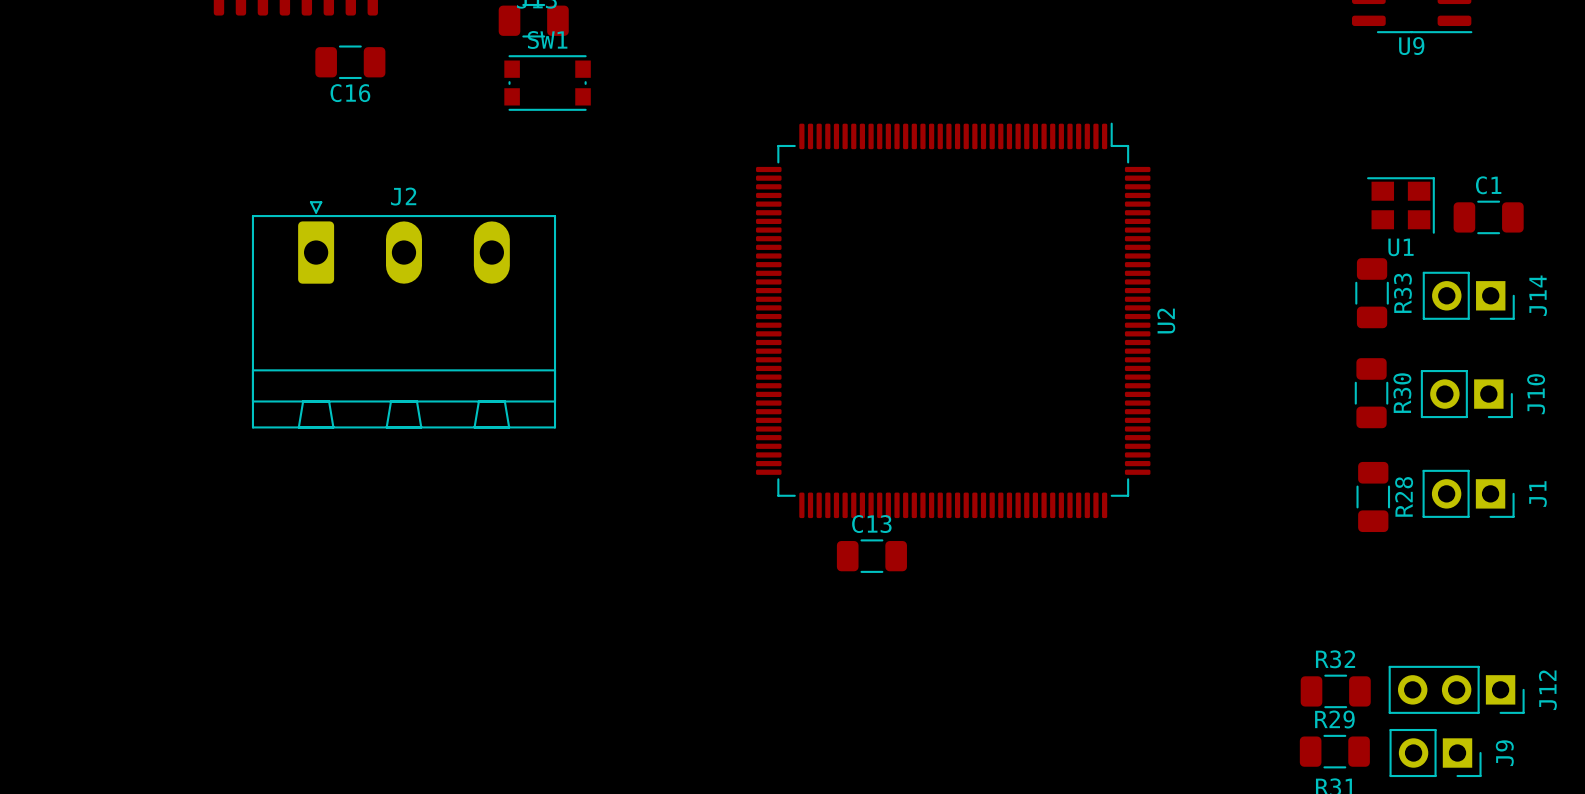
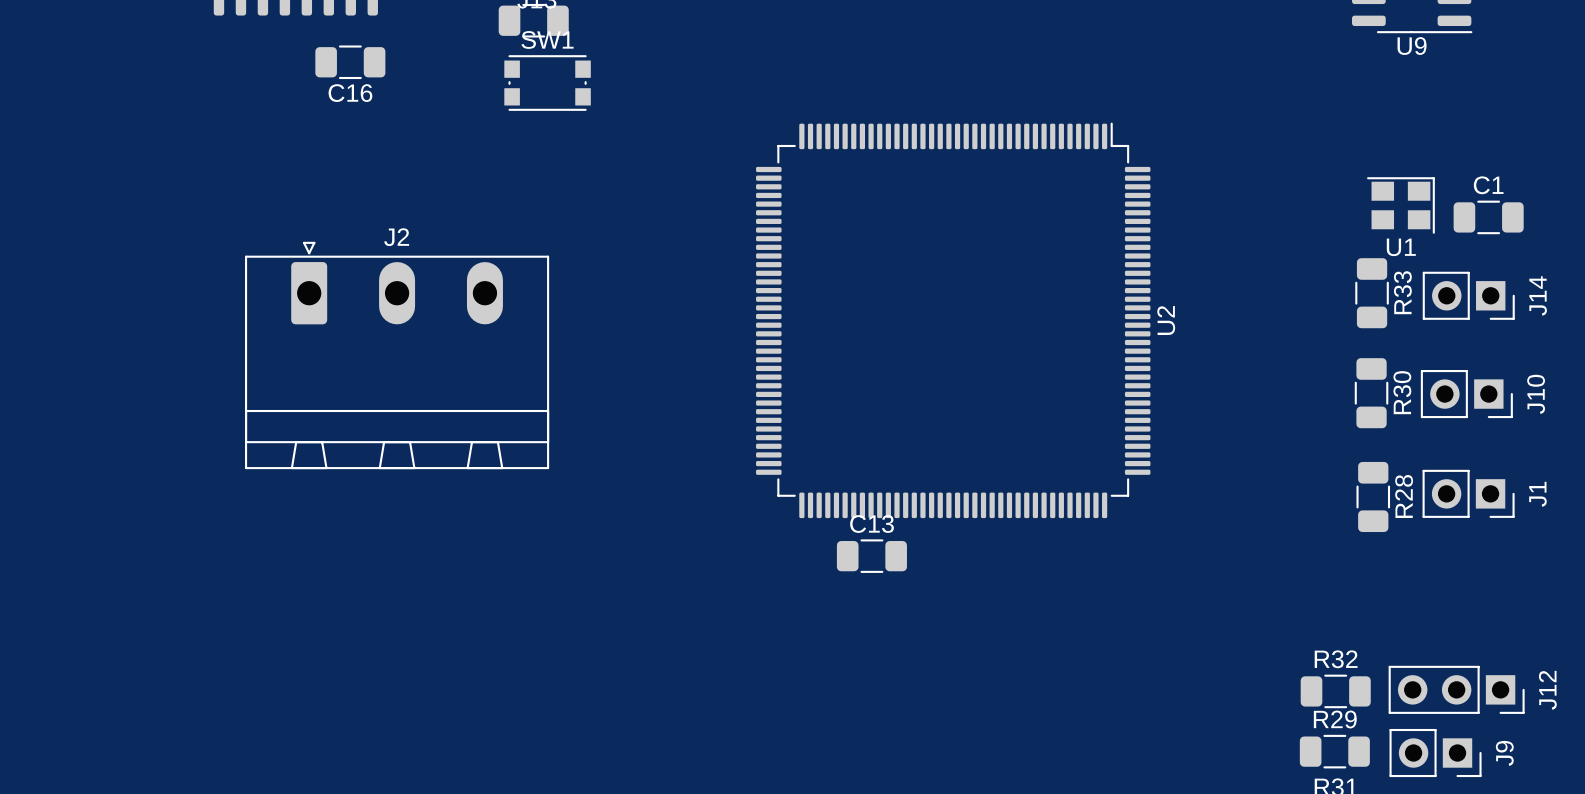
J2 position: (403, 314) -> (397, 355)

